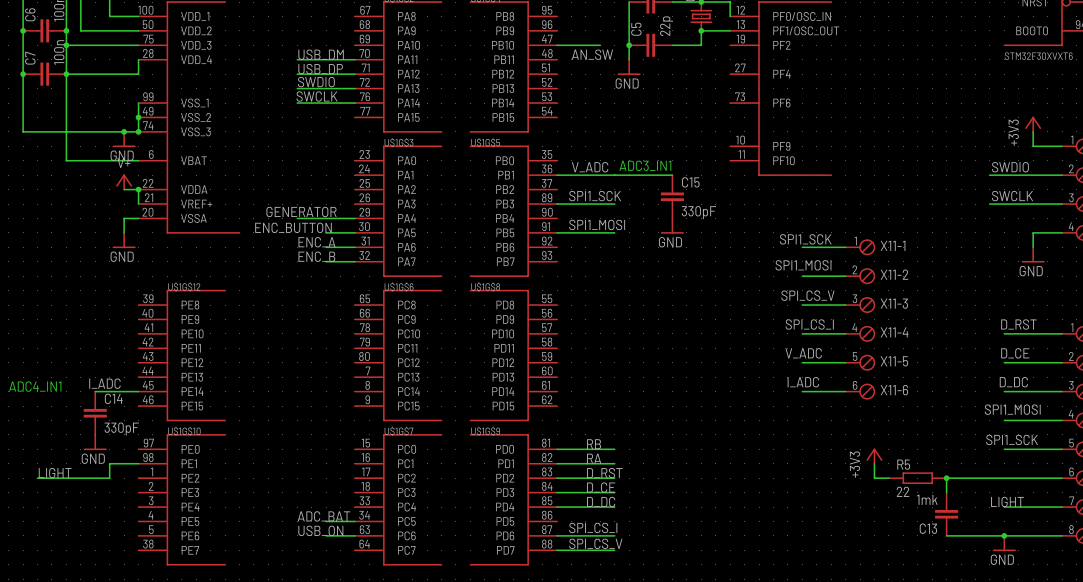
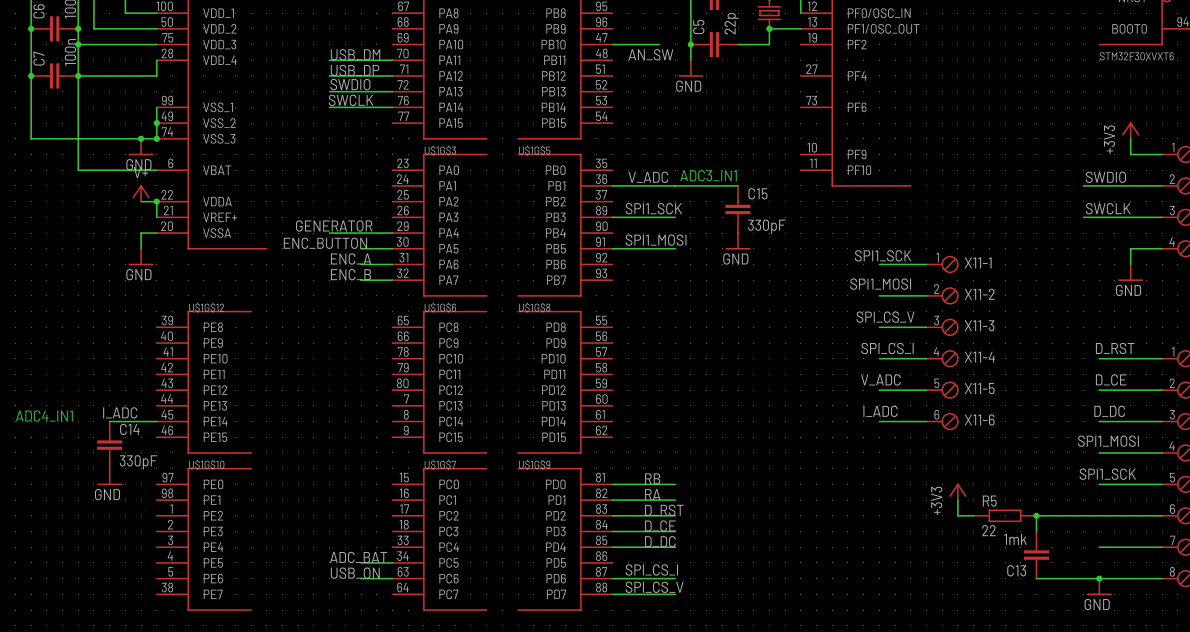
wire: (138, 463) (109, 463) (109, 478) (37, 478) -> none
label: LIGHT (55, 473) -> none
label: LIGHT (1007, 501) -> none

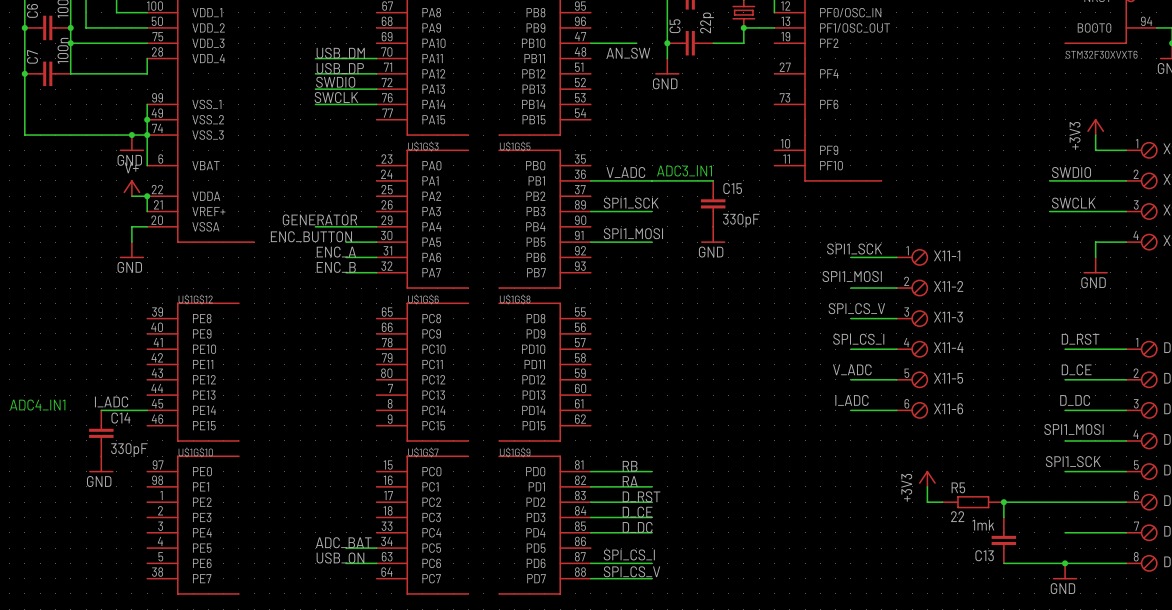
wire: (78, 75) (78, 170) (156, 170) -> (147, 135) (147, 165)
junction: (78, 75) -> none

